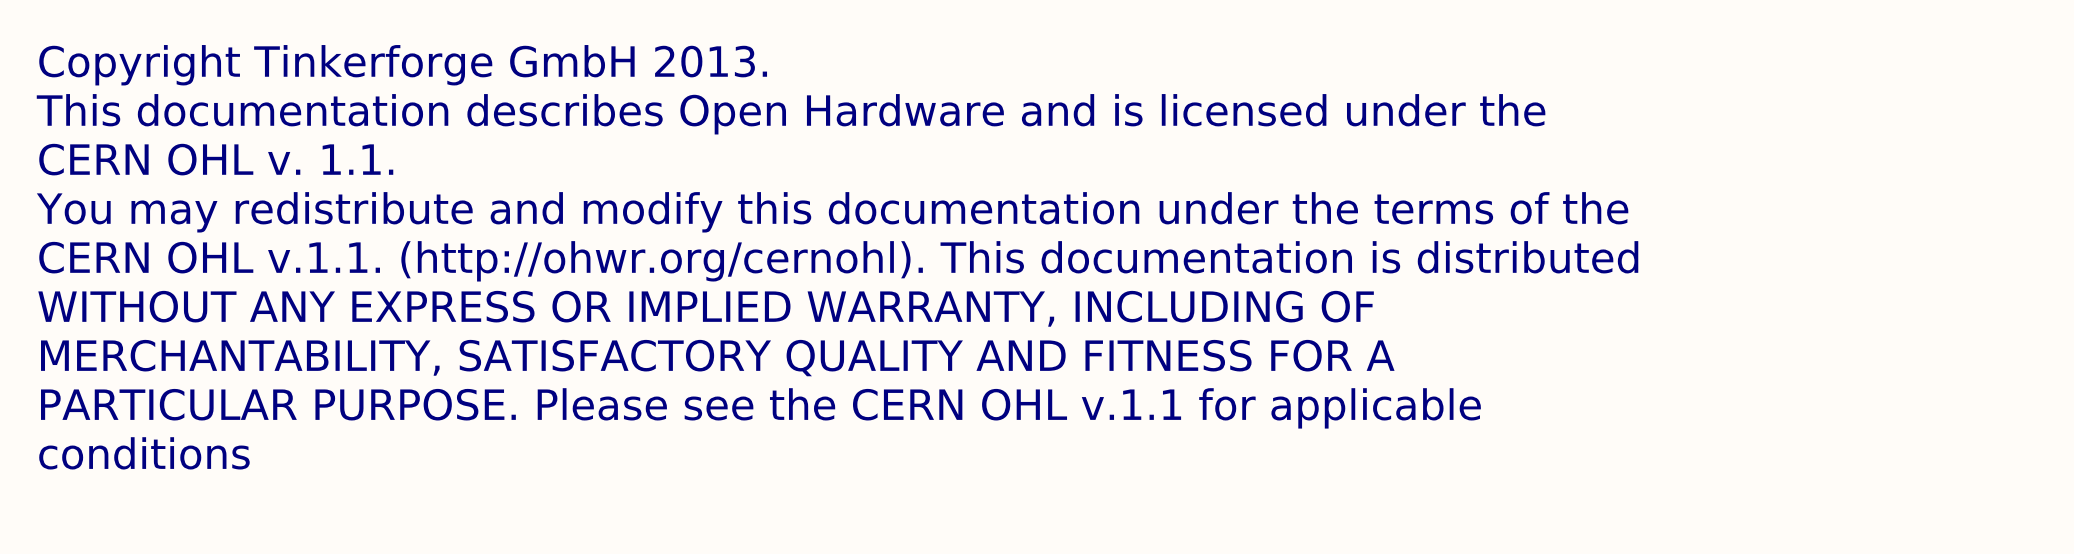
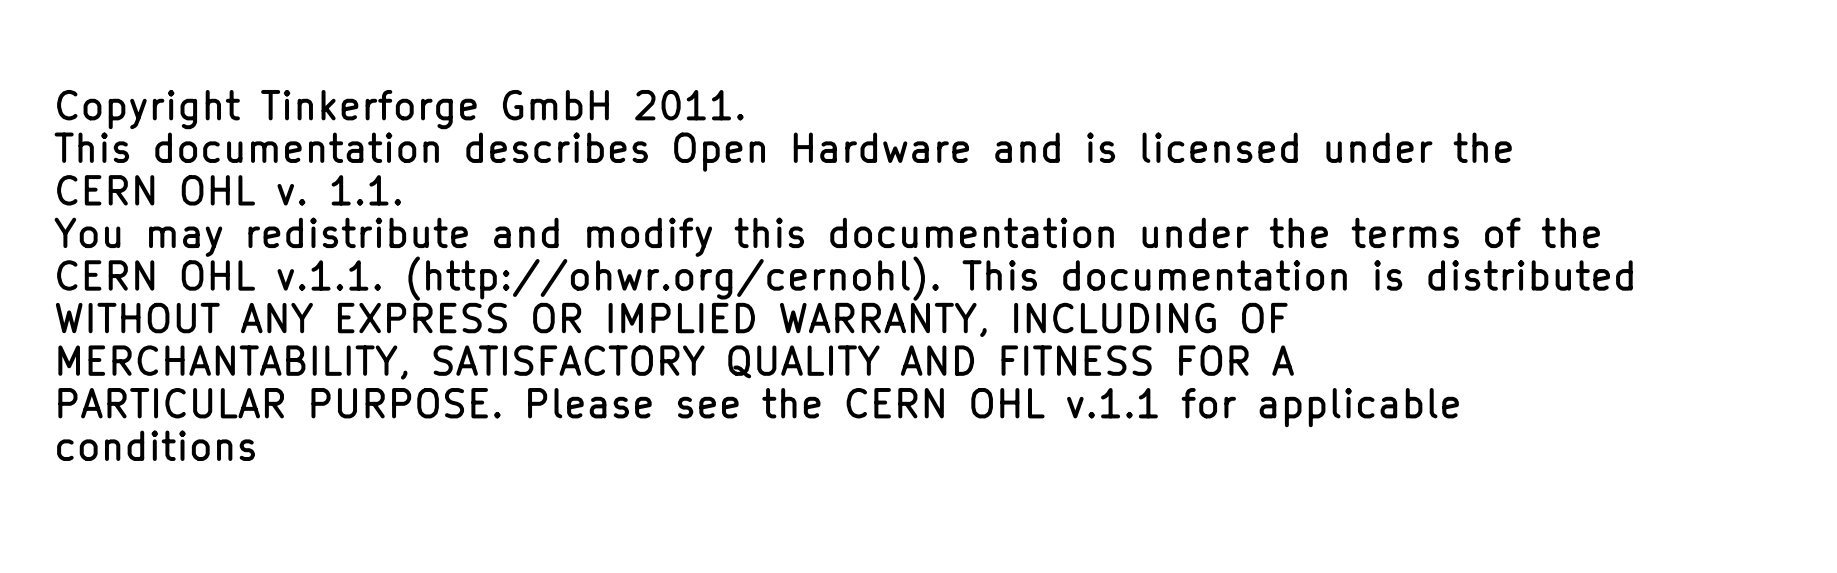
text: Copyright Tinkerforge GmbH 2013. (403, 65) -> Copyright Tinkerforge GmbH 2011. (400, 109)

